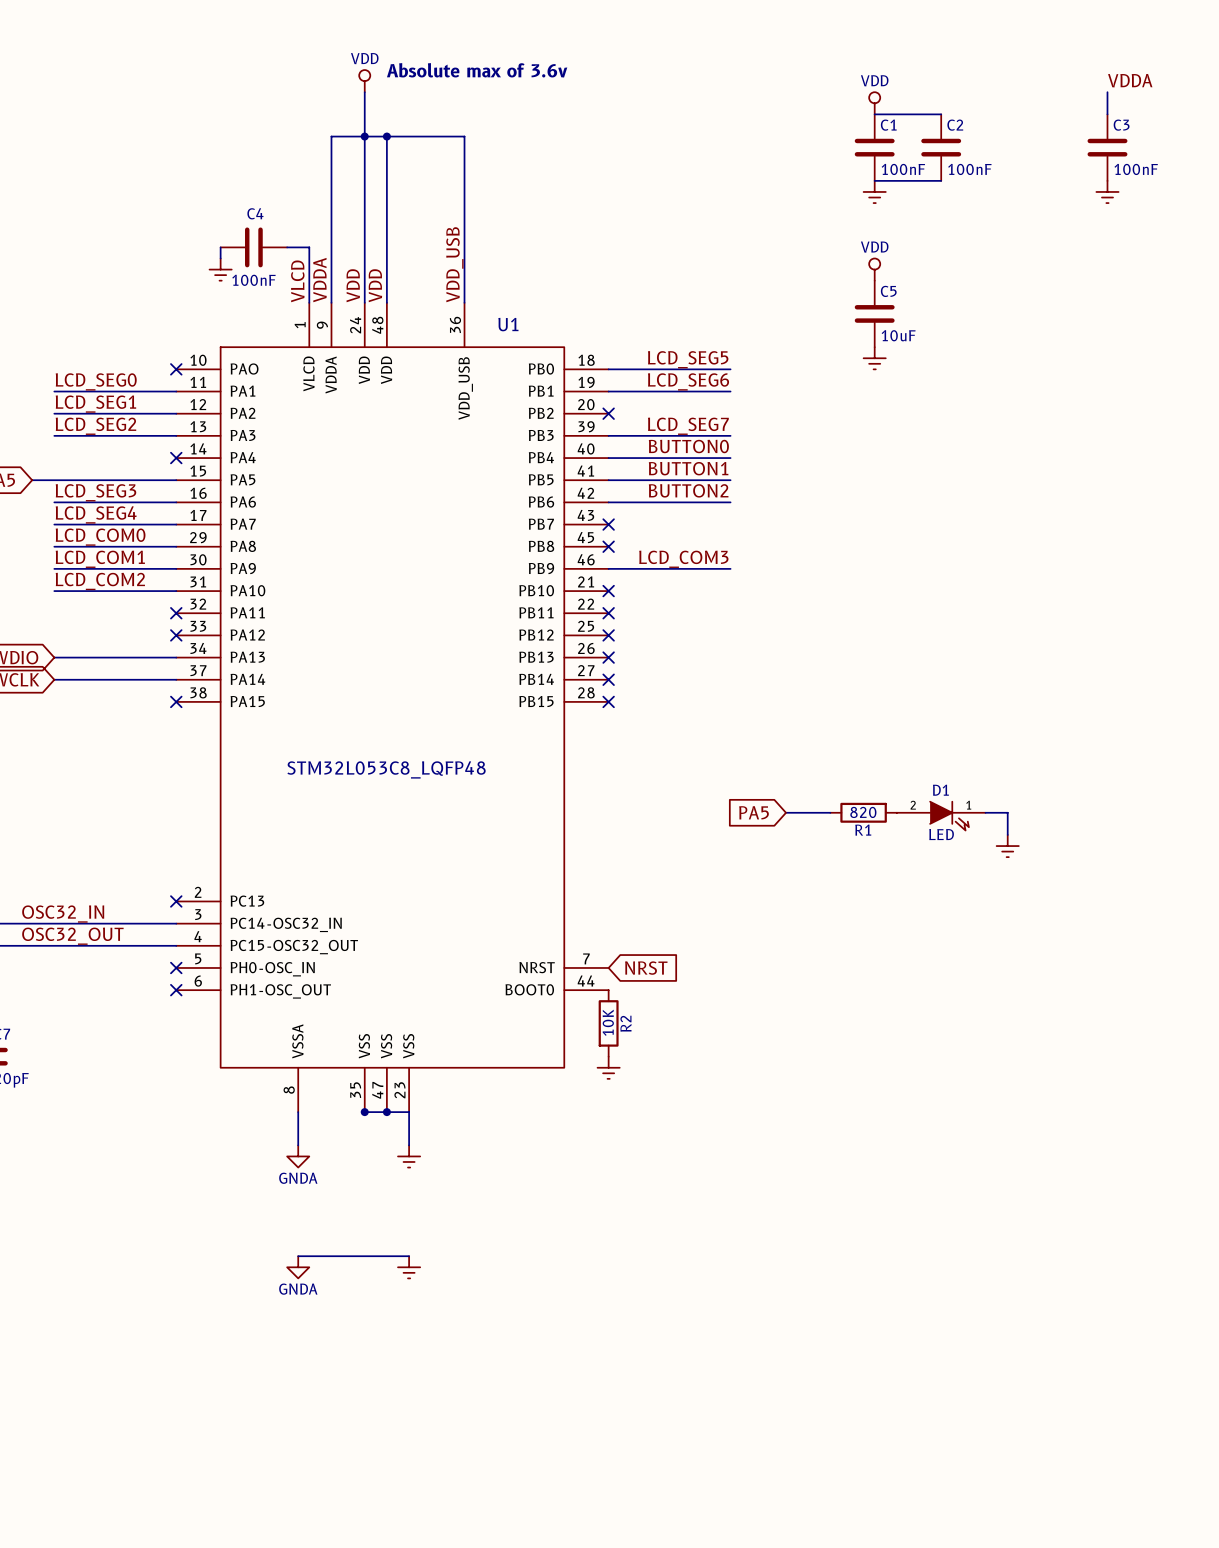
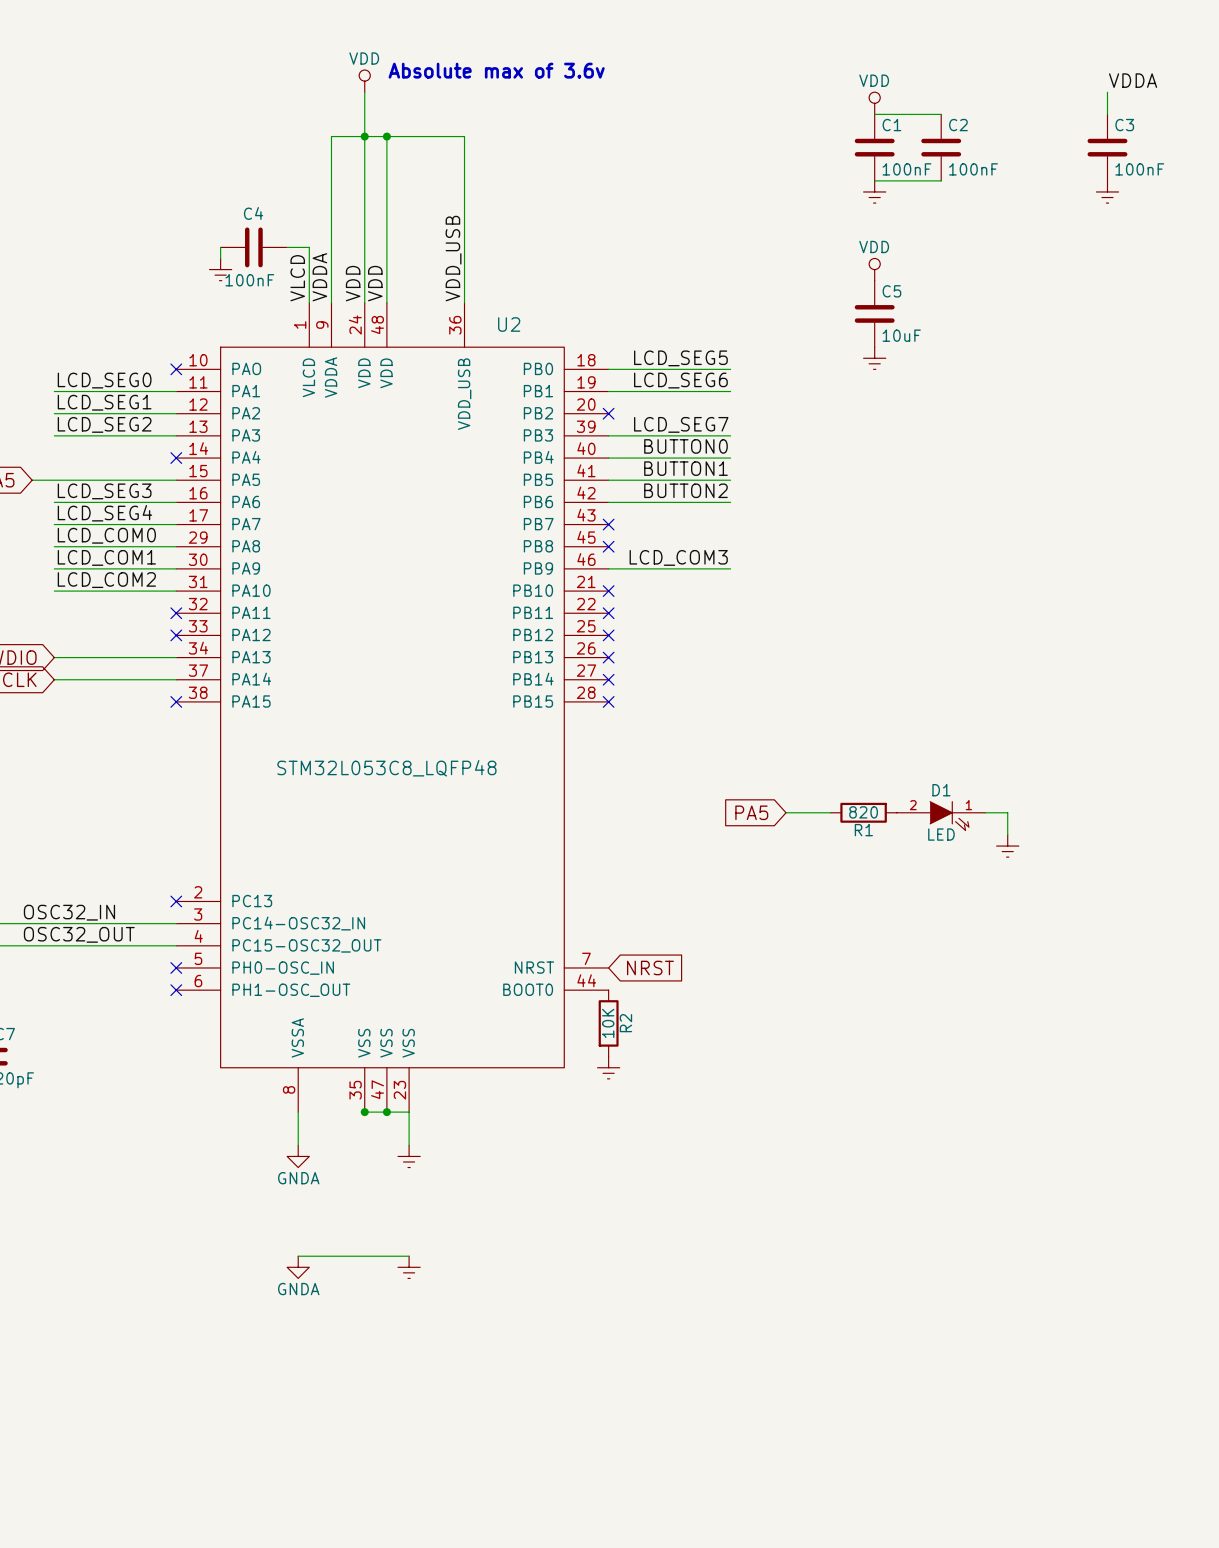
U1 name: U1 (508, 324) -> U2 (509, 324)

